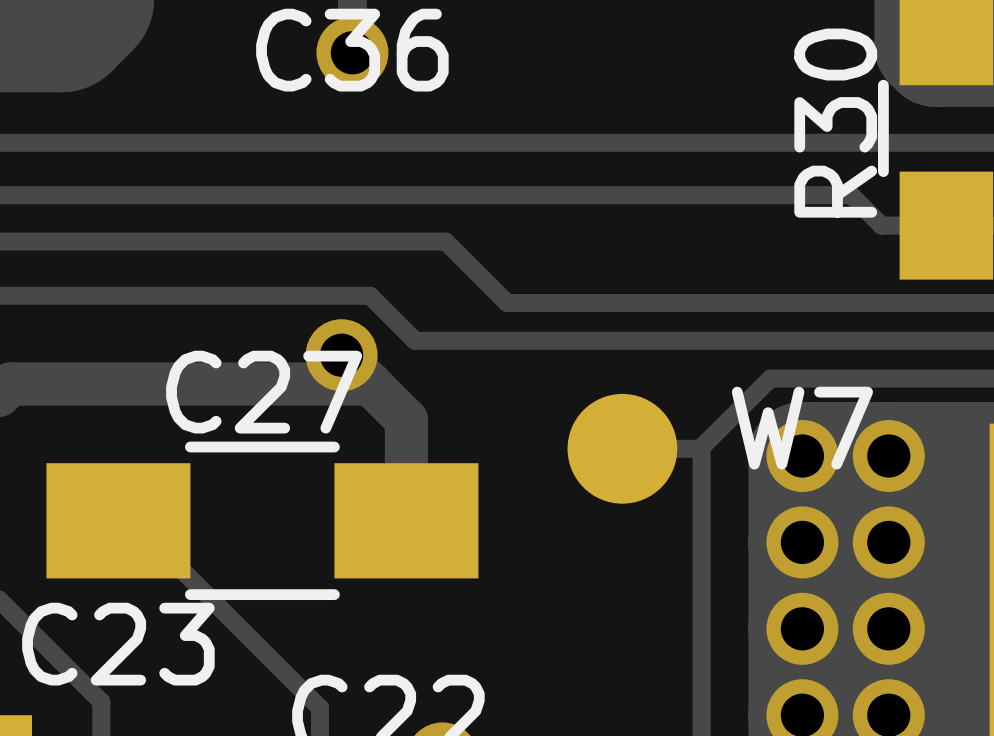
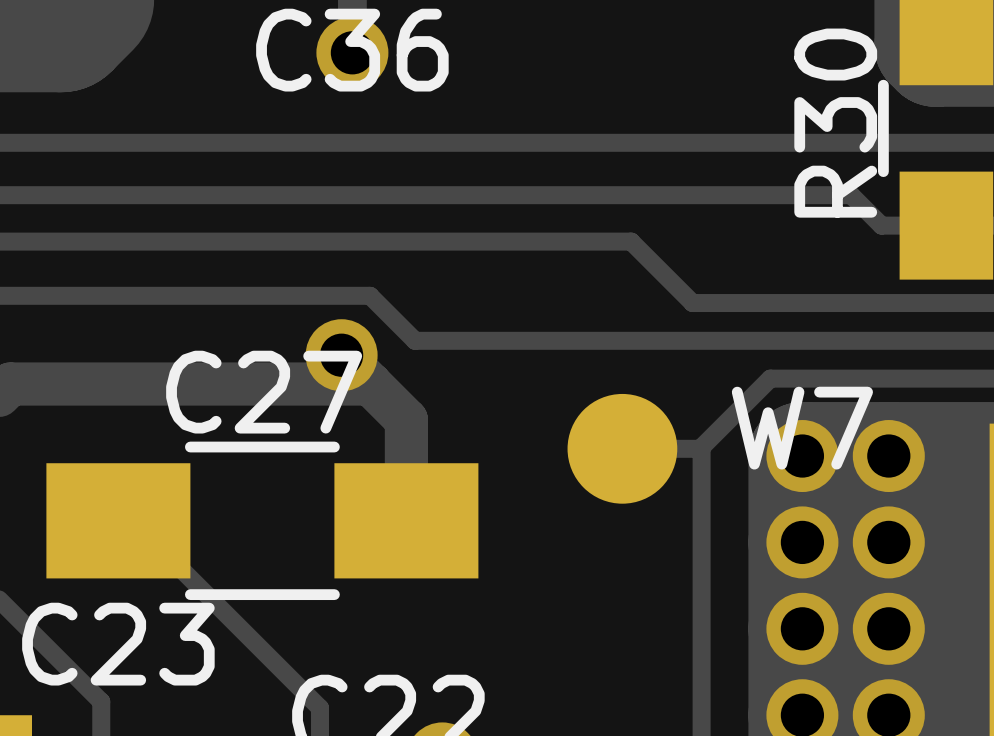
track: (445, 241) (507, 303) (692, 303) -> (445, 241) (631, 241) (692, 303)

